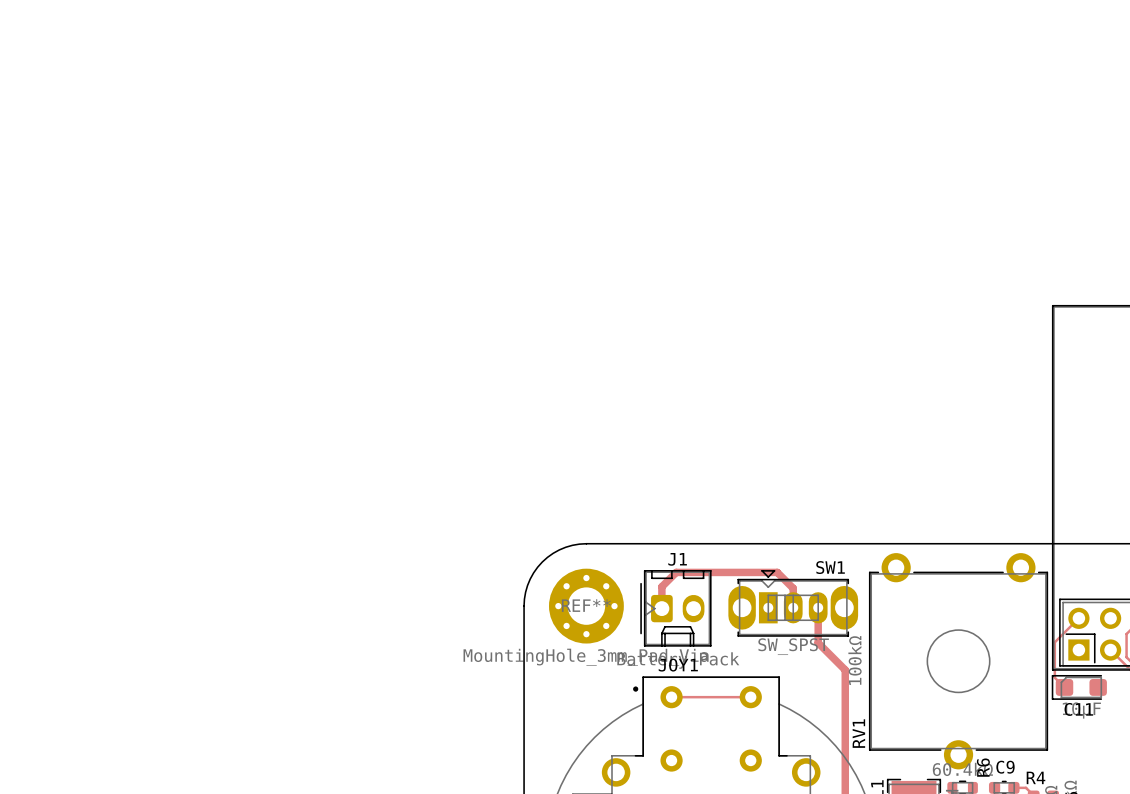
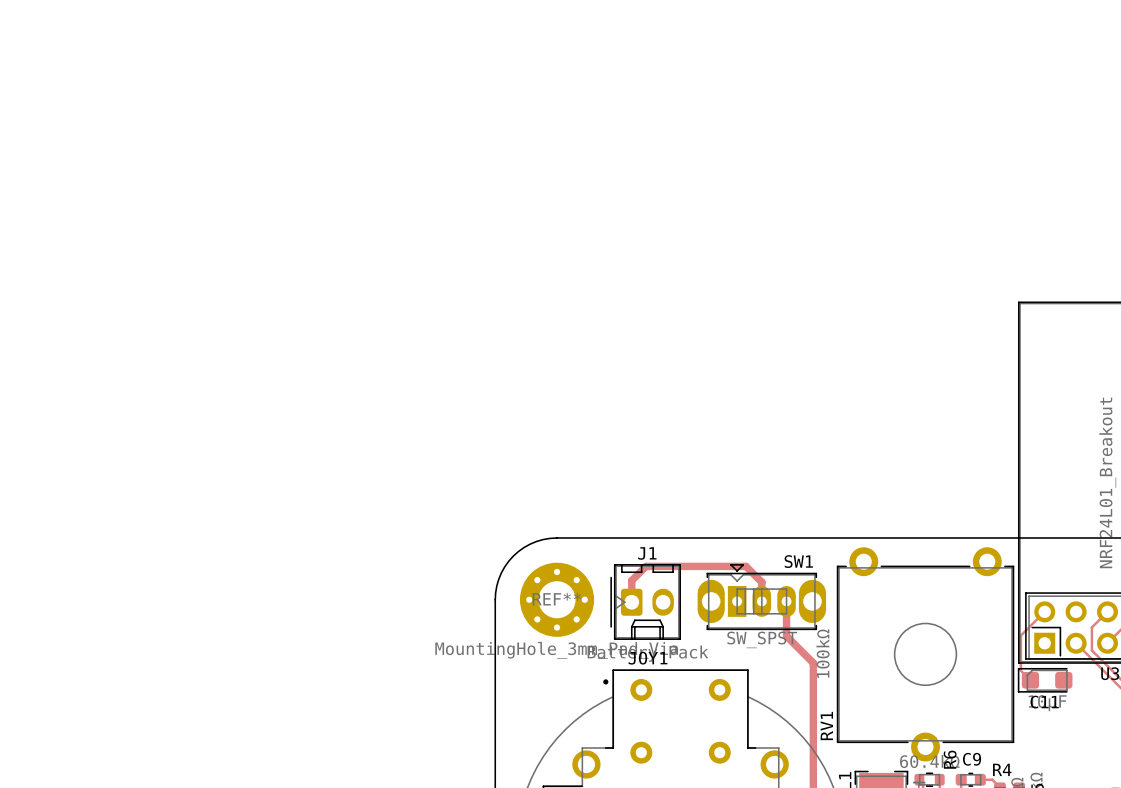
track: (671, 697) (750, 697) -> none

